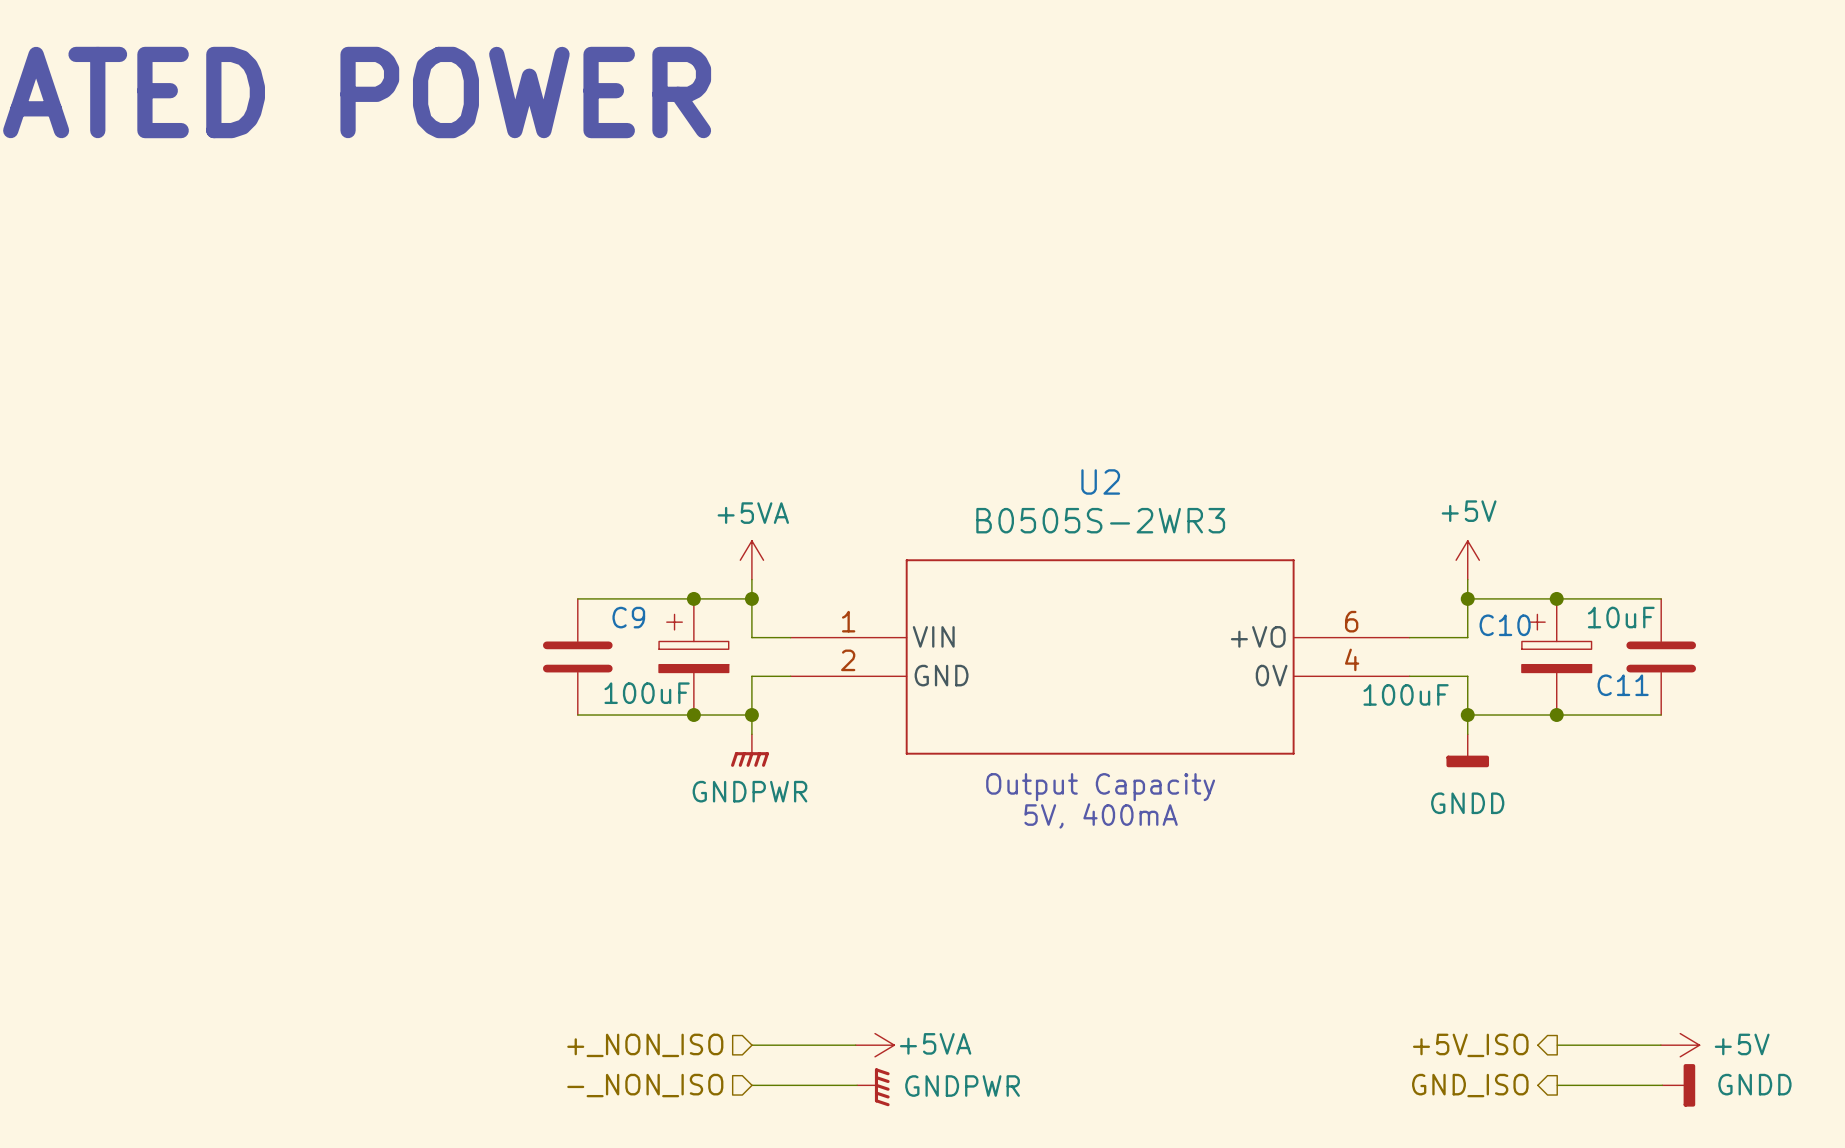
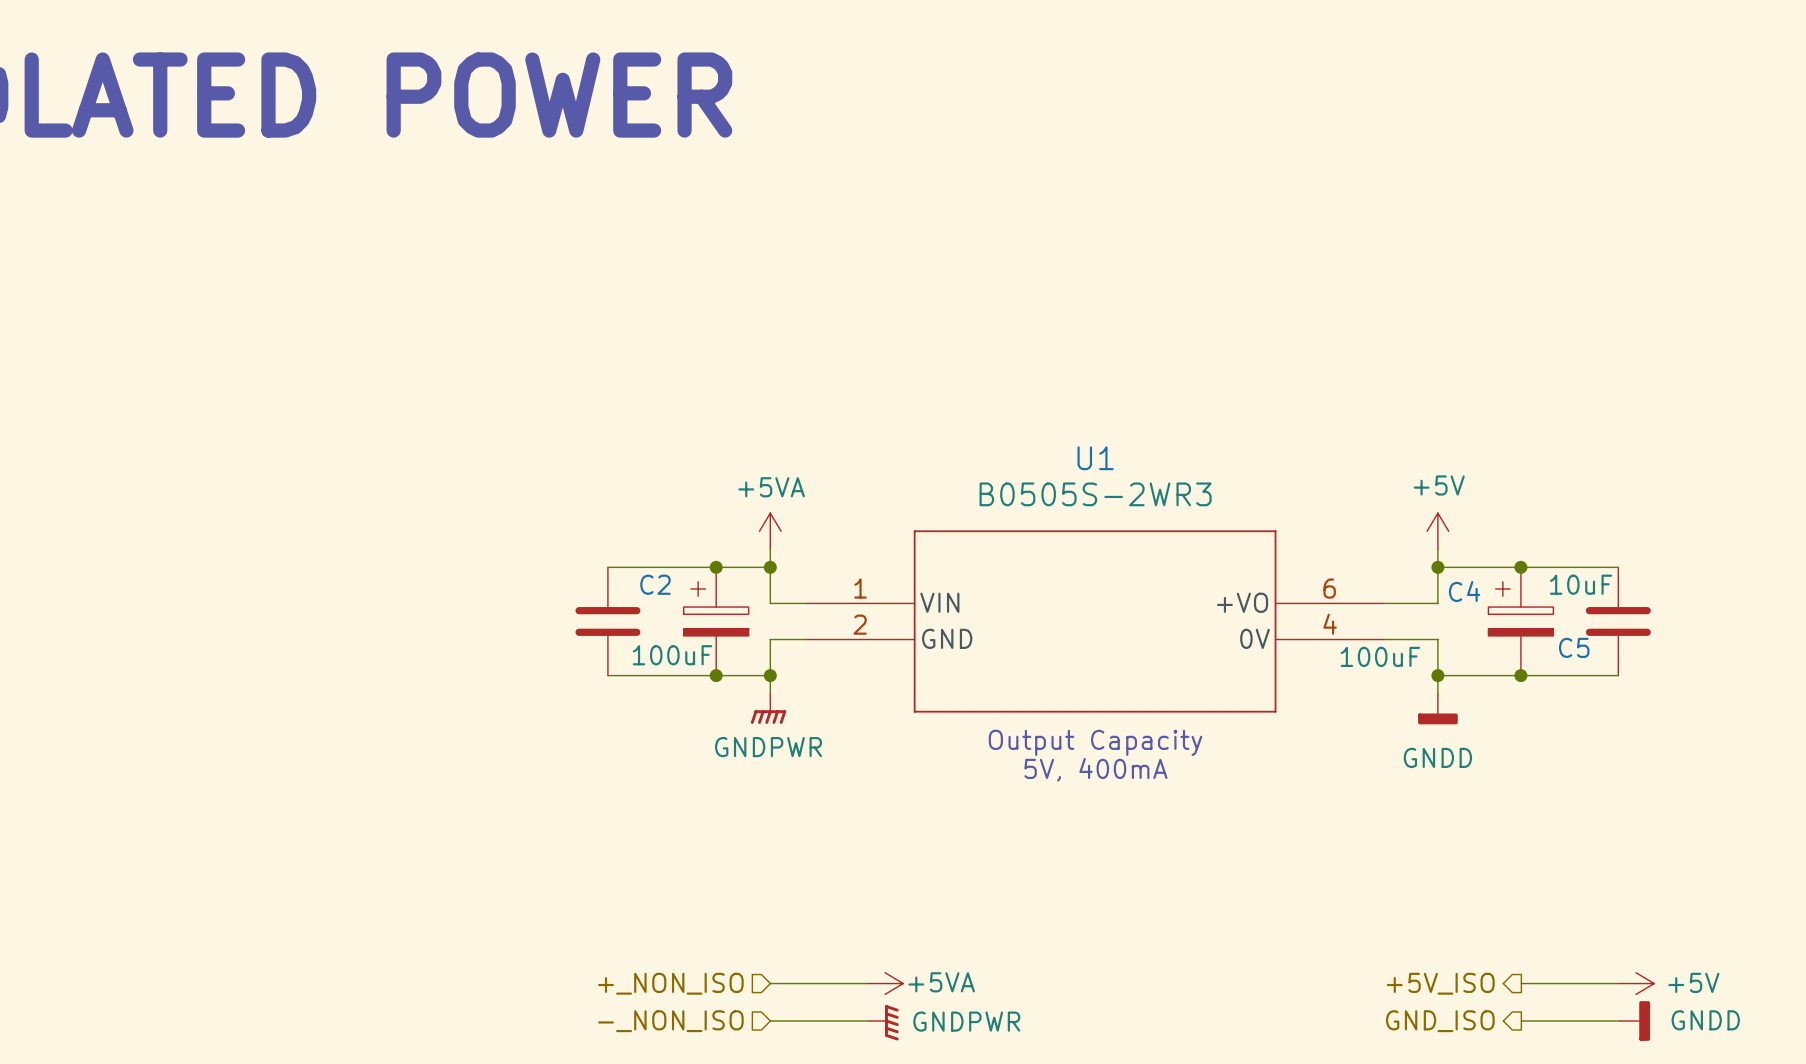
U2 name: U2 (1100, 481) -> U1 (1095, 458)
C9 name: C9 (628, 617) -> C2 (655, 584)
C10 name: C10 (1505, 625) -> C4 (1464, 591)
C11 name: C11 (1623, 685) -> C5 (1574, 647)

